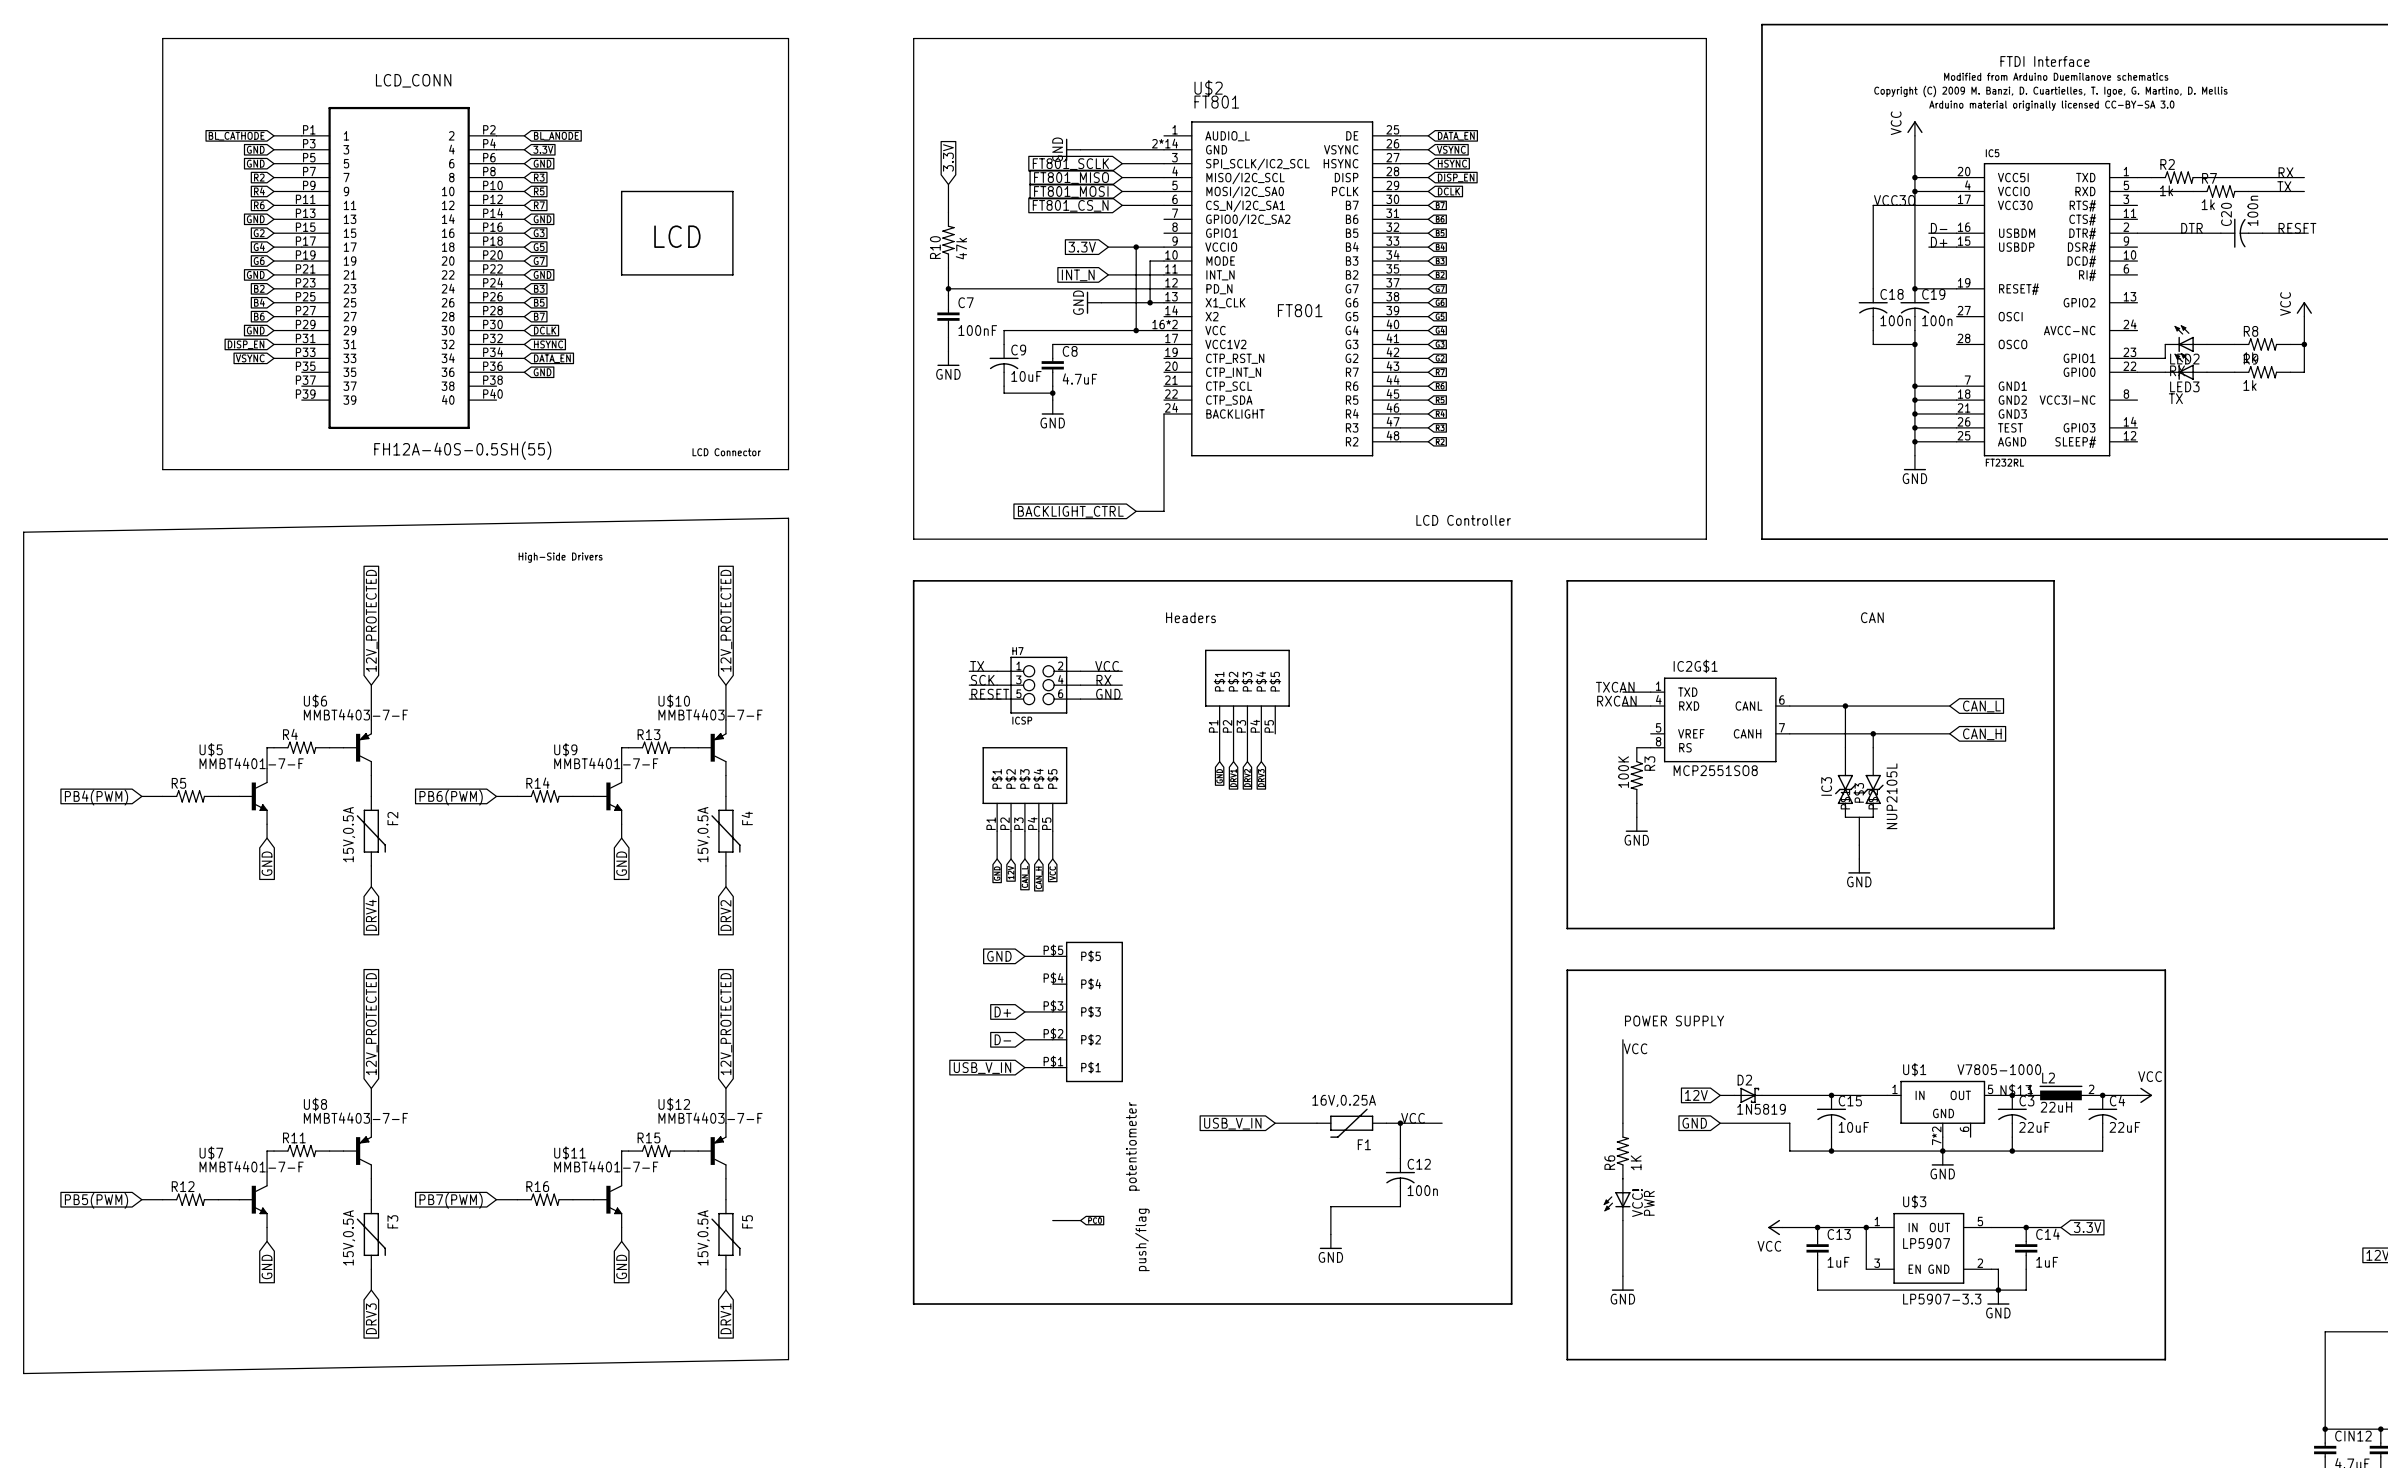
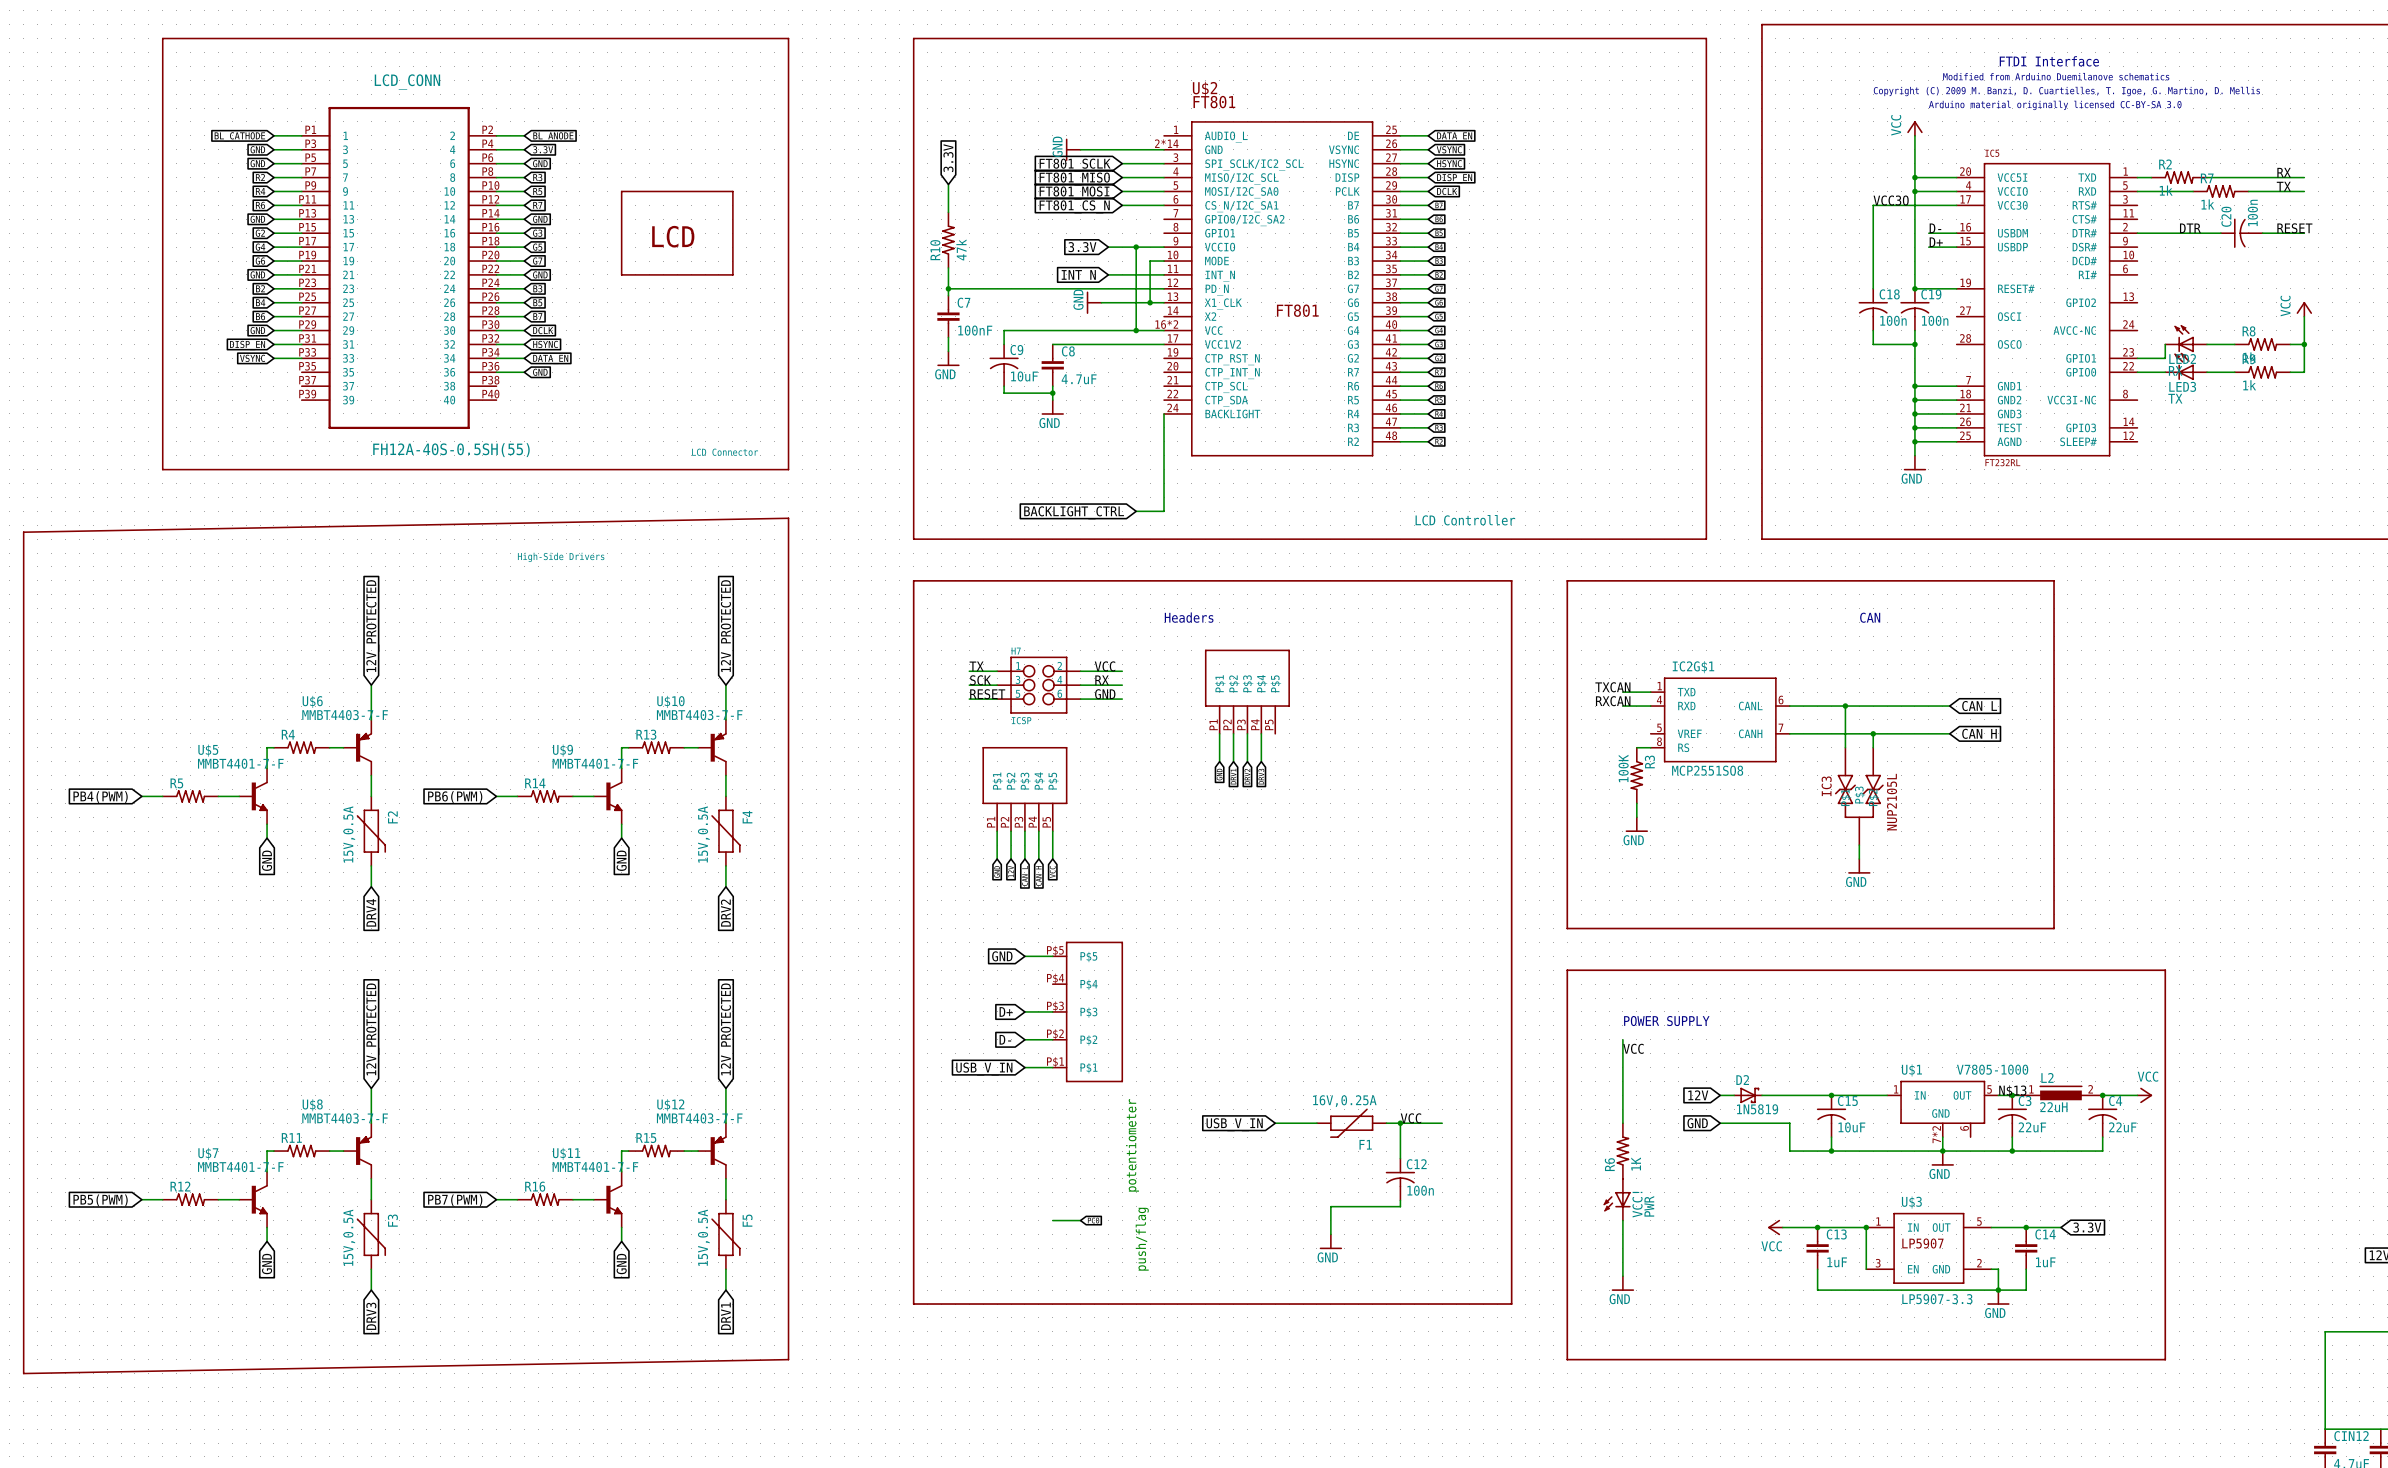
junction: (2325, 1429) -> none
junction: (2380, 1429) -> none

